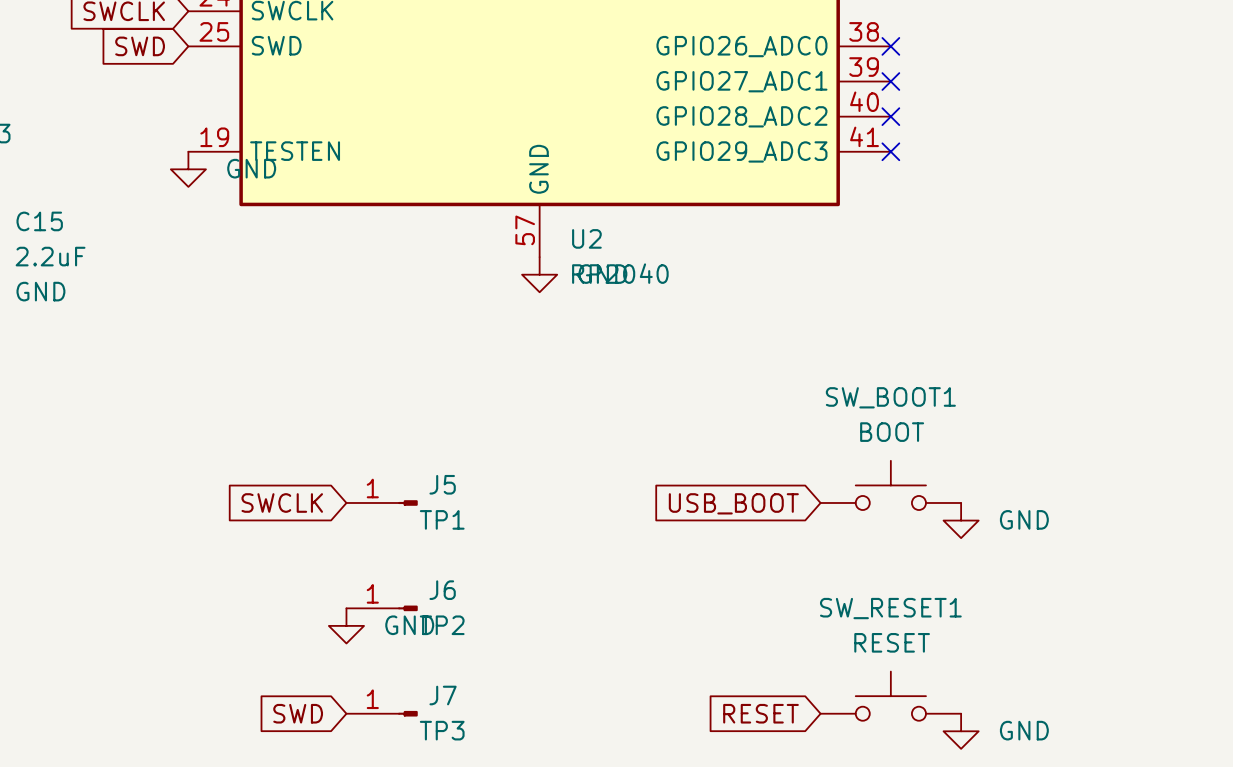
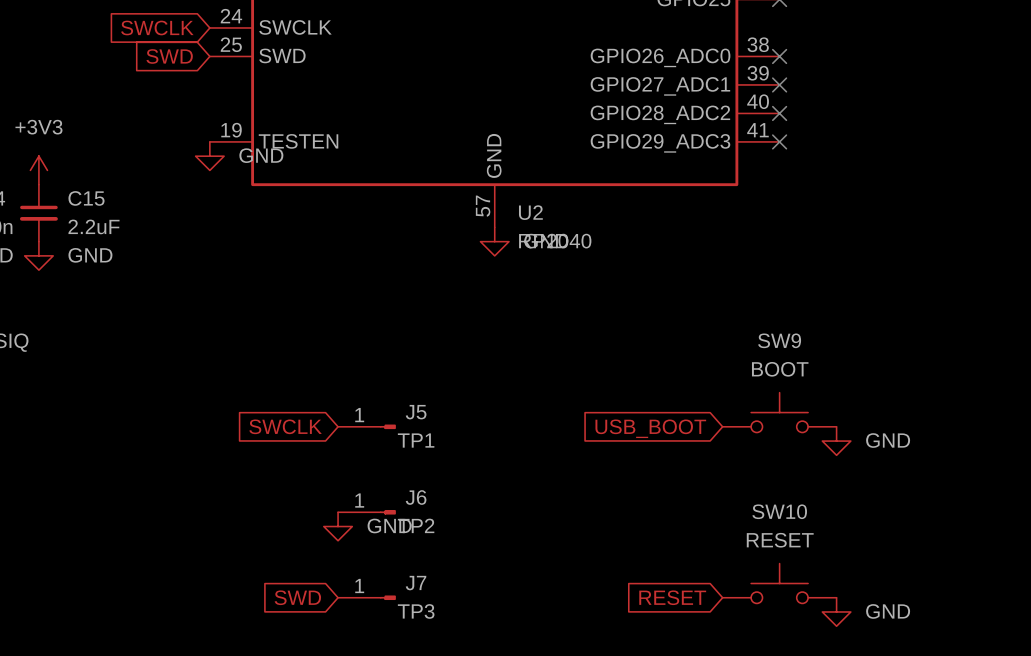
SW_BOOT1 name: SW_BOOT1 (890, 397) -> SW9 (779, 340)
SW_RESET1 name: SW_RESET1 (890, 608) -> SW10 (779, 511)

